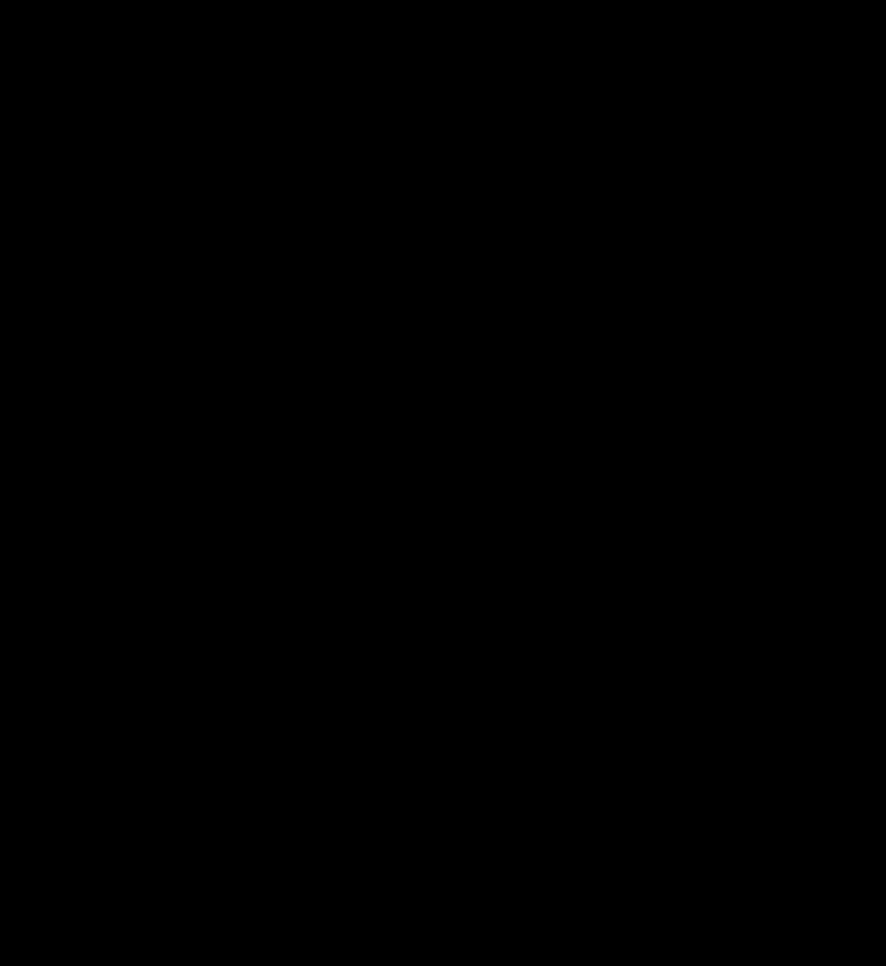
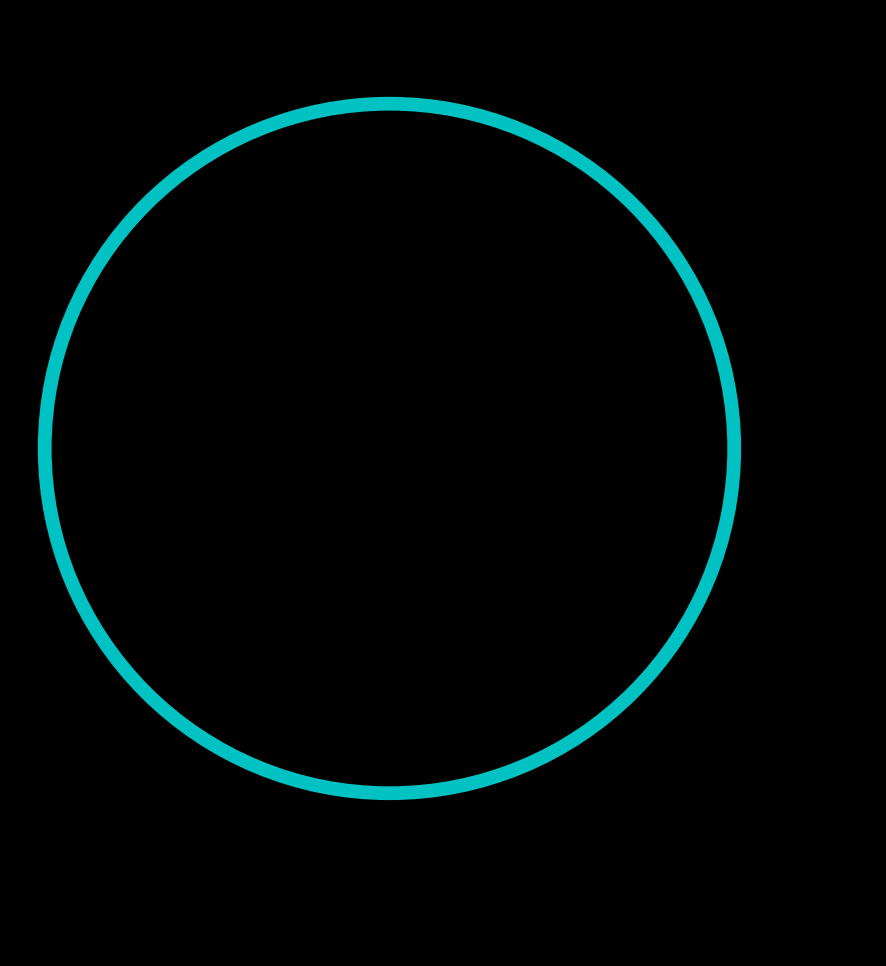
drawing: none -> [37, 96, 742, 801]

